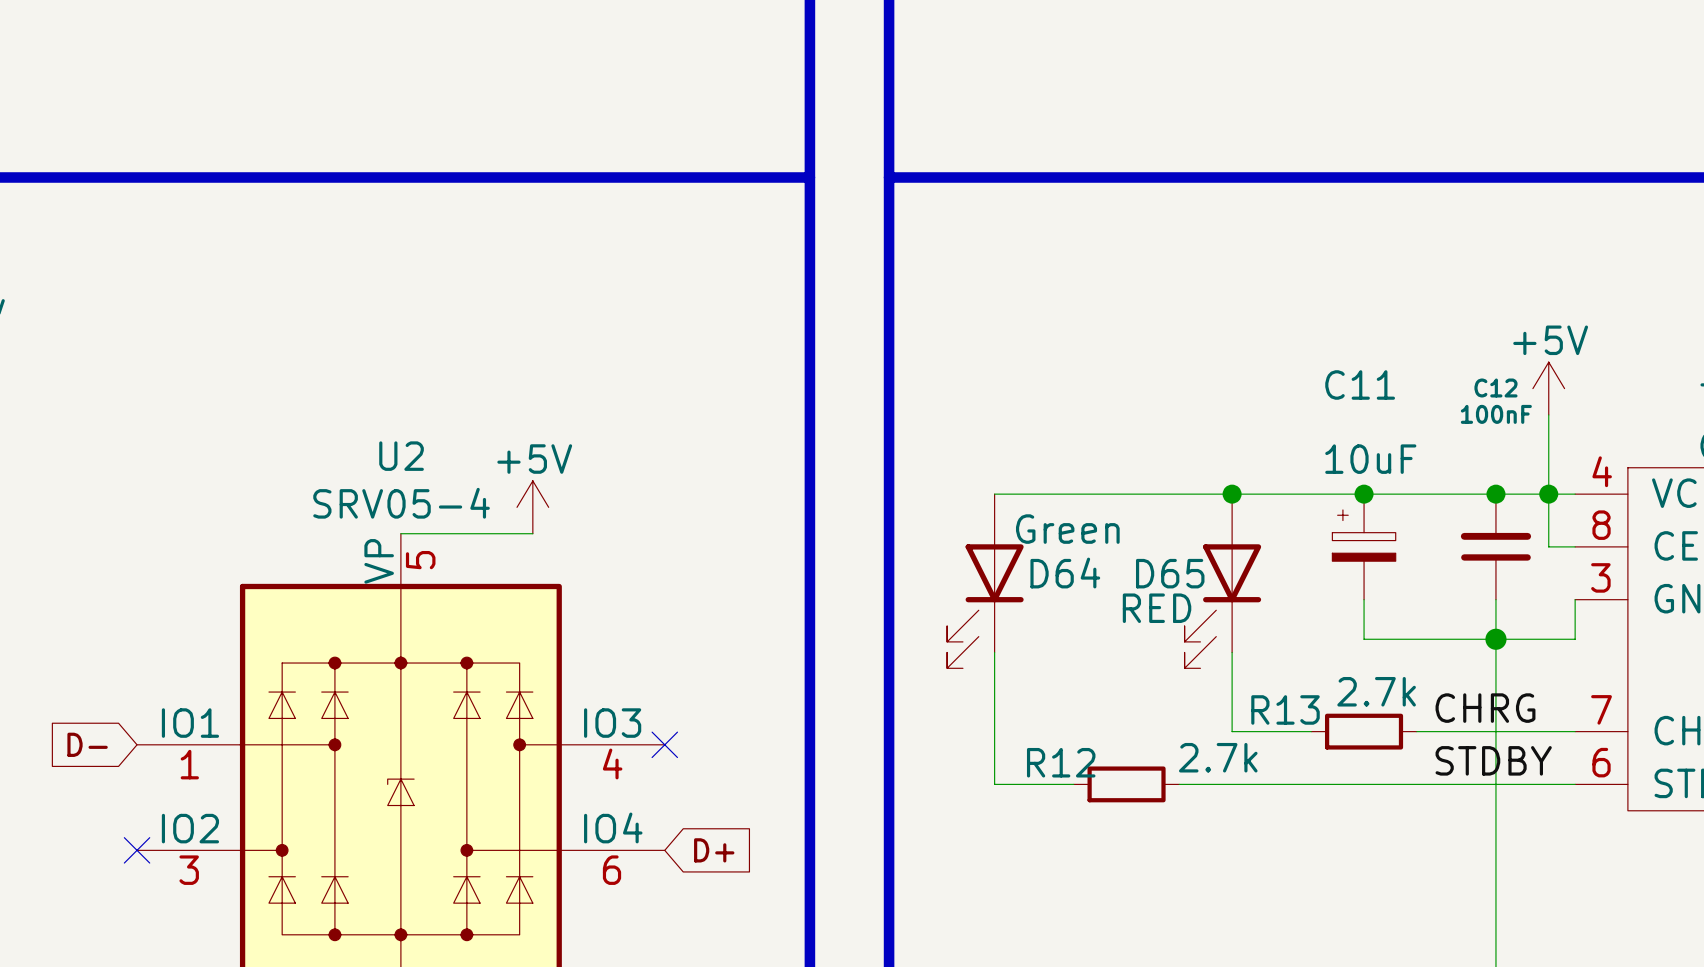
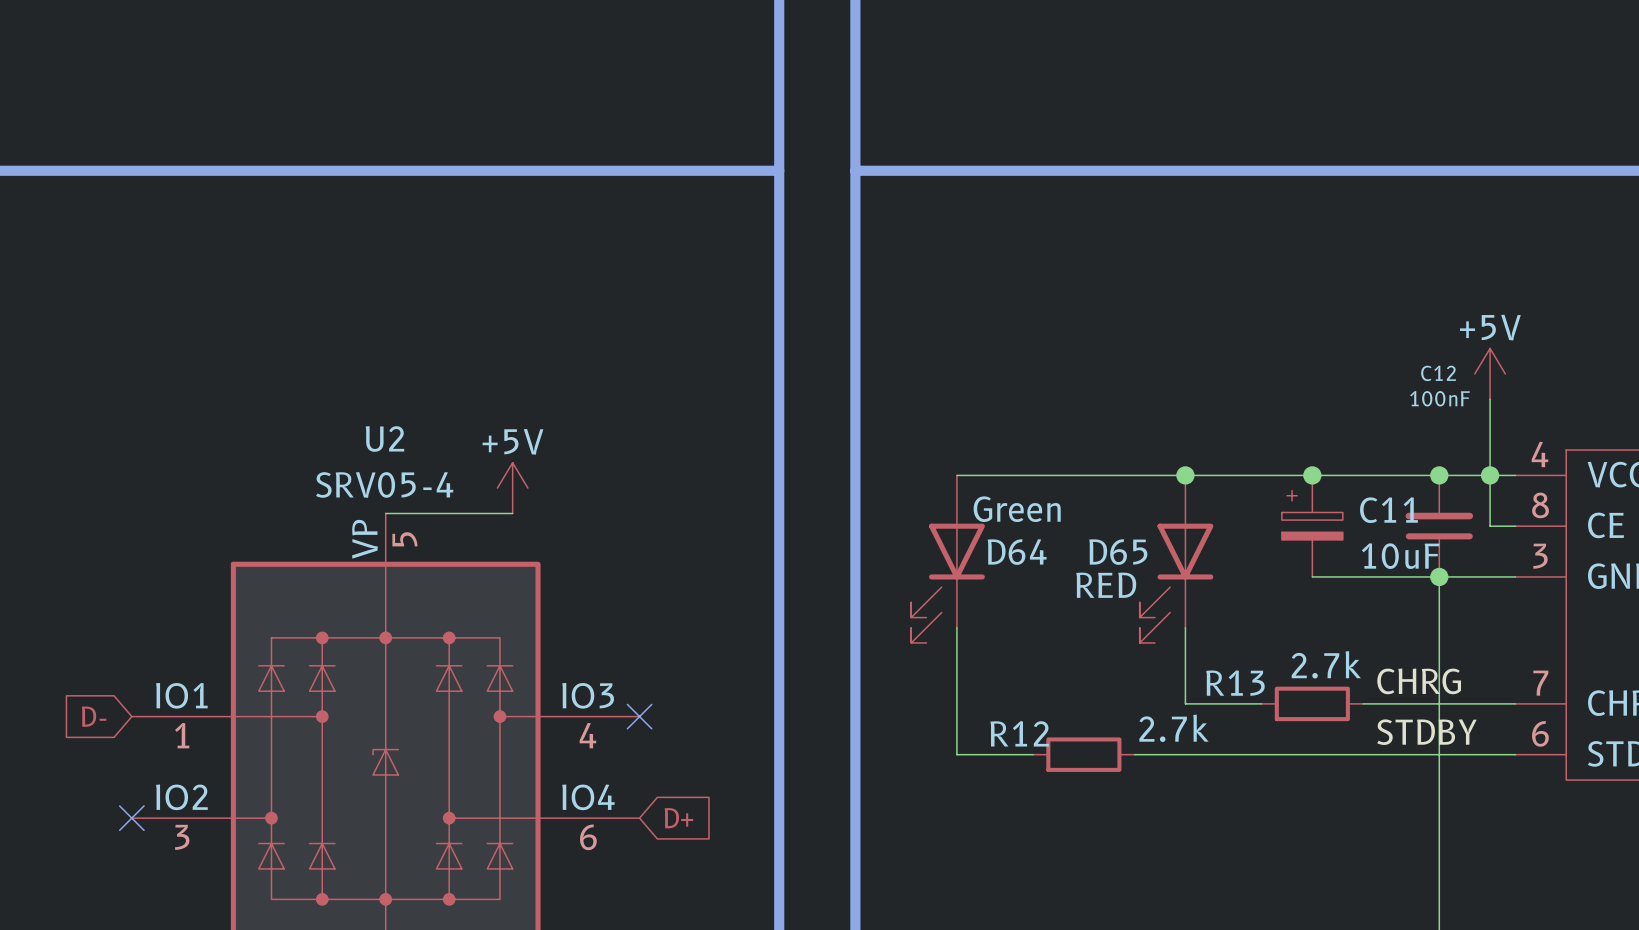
C11 name position: C11 (1360, 384) -> C11 (1388, 510)
C11 value position: 10uF (1370, 459) -> 10uF (1400, 556)
wire: (1364, 599) (1364, 639) (1575, 639) (1575, 599) -> (1312, 576) (1515, 576)
junction: none -> (1439, 576)
junction: (1495, 639) -> none

